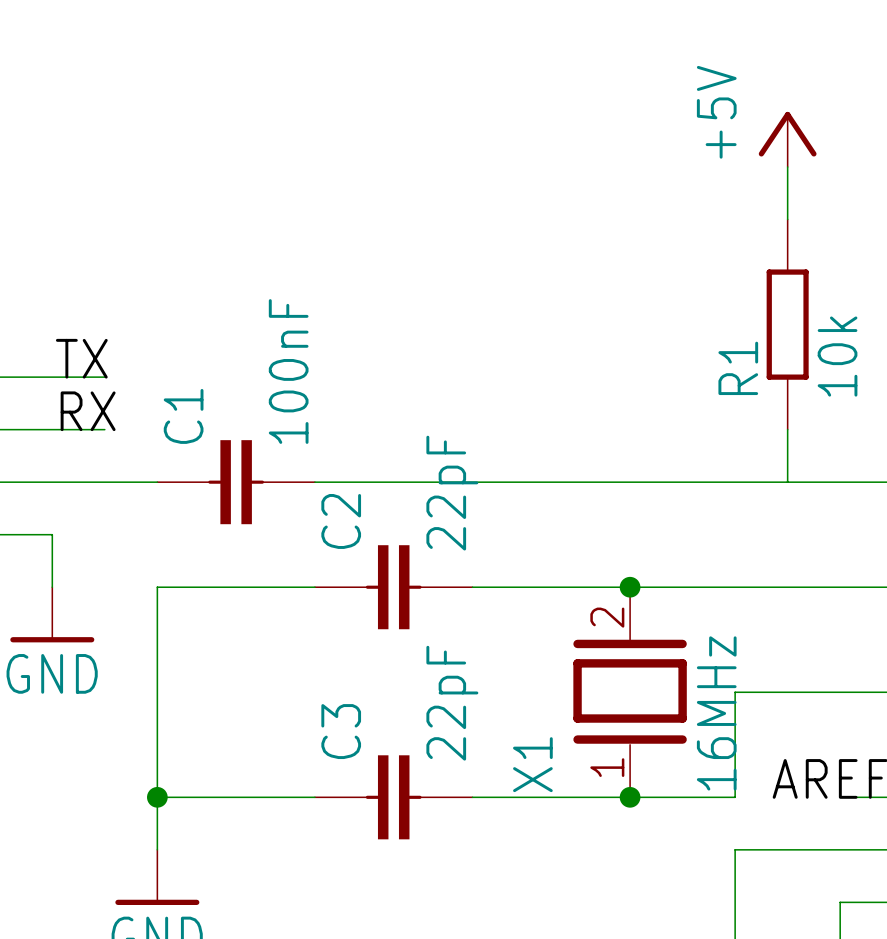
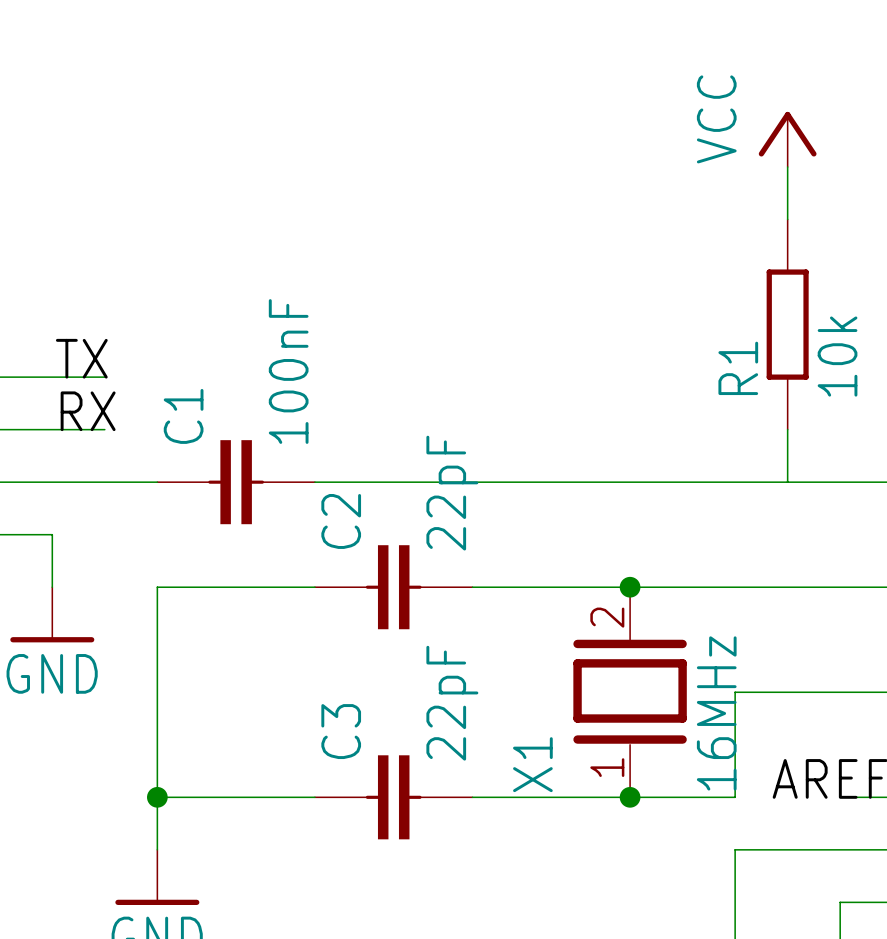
power symbol: +5V (787, 139) -> VCC (787, 139)

